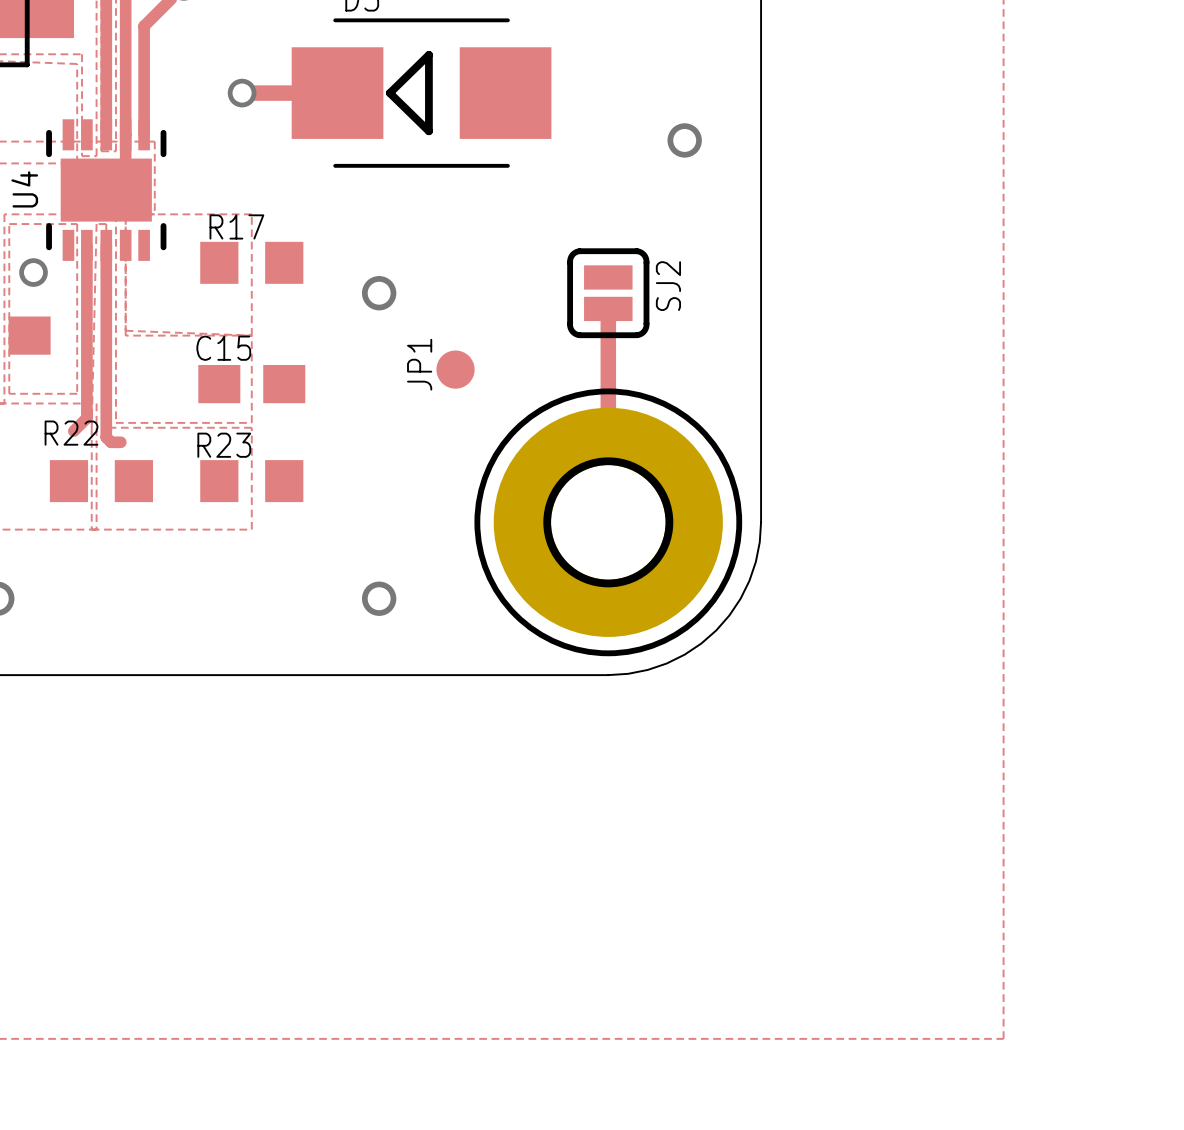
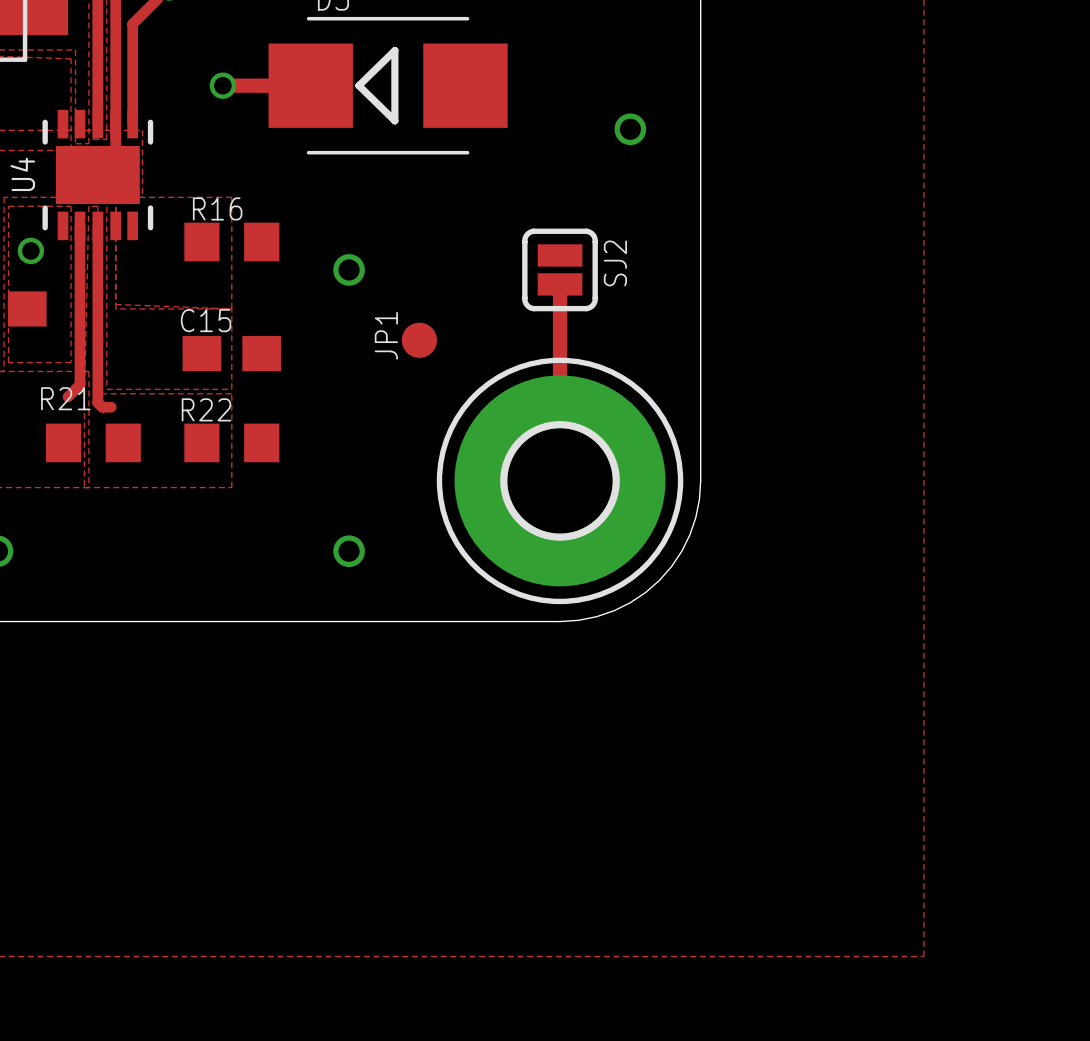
R17 name: R17 (236, 226) -> R16 (217, 208)
R22 name: R22 (71, 433) -> R21 (65, 398)
R23 name: R23 (224, 445) -> R22 (206, 409)

